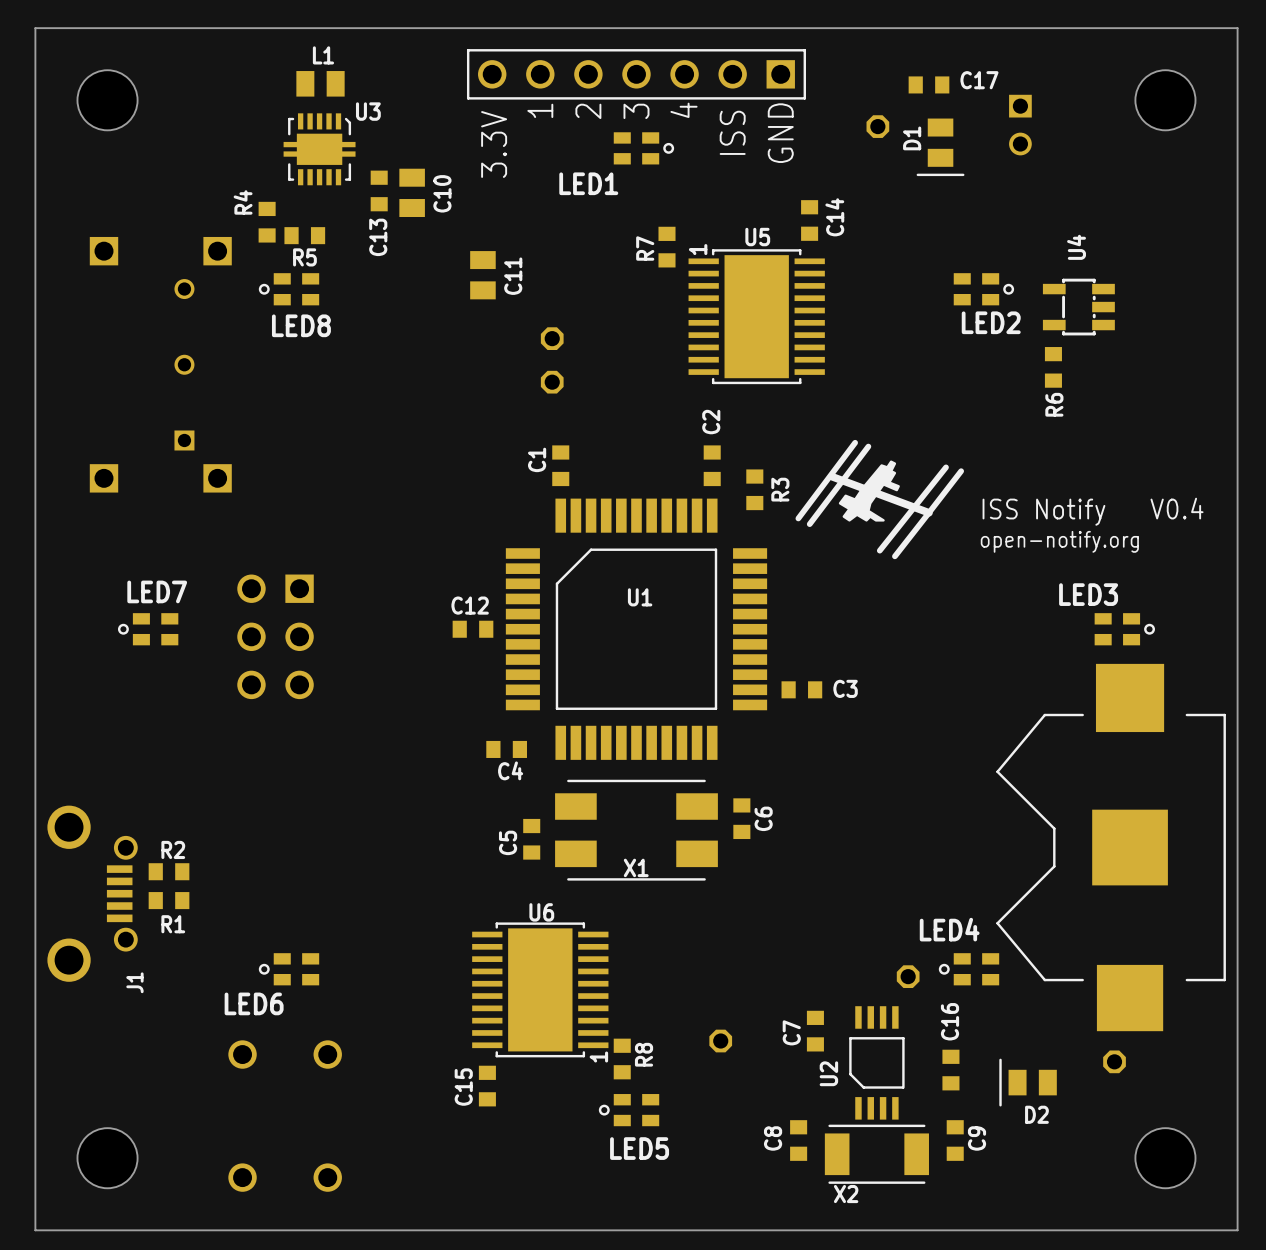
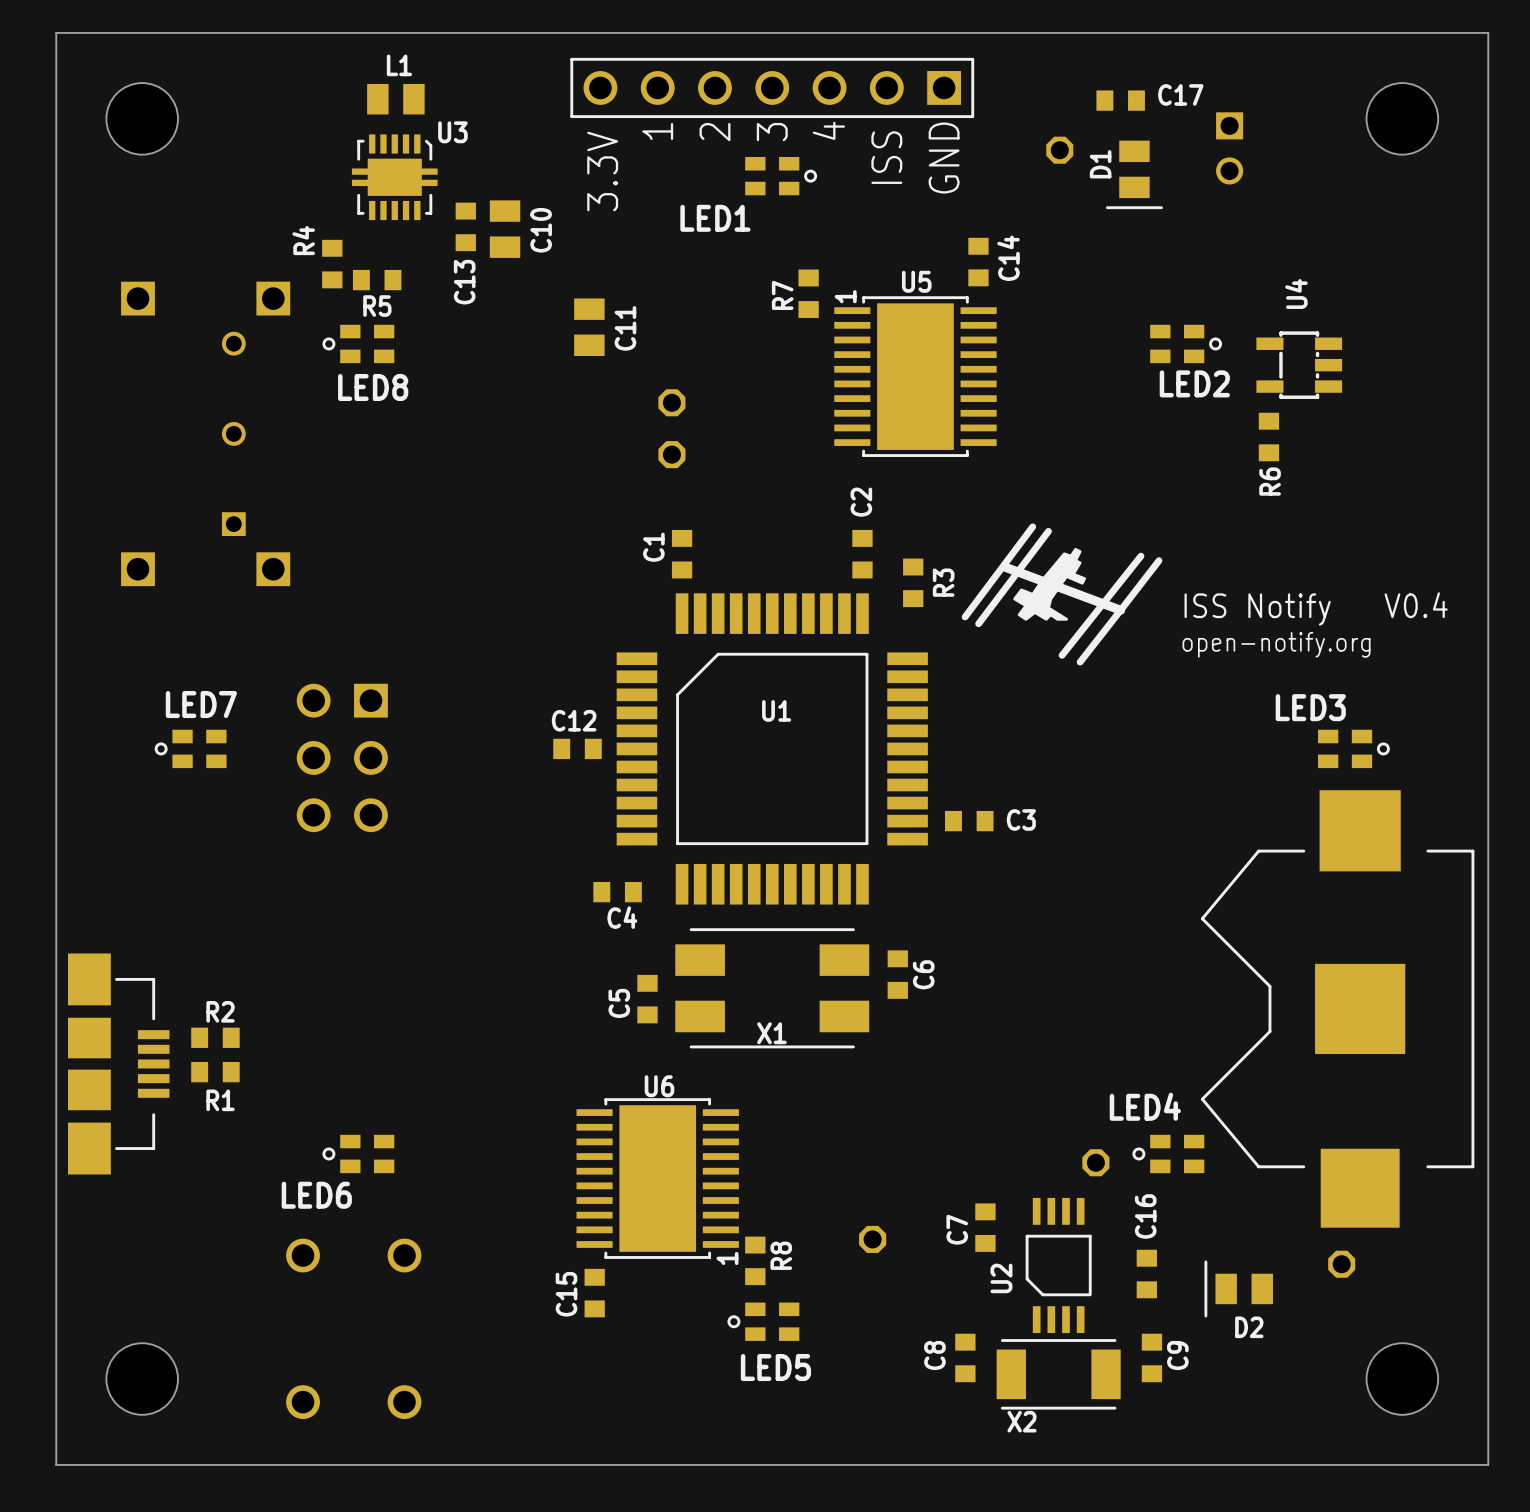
part: none -> (118, 1063)
J1: (92, 893) -> none

